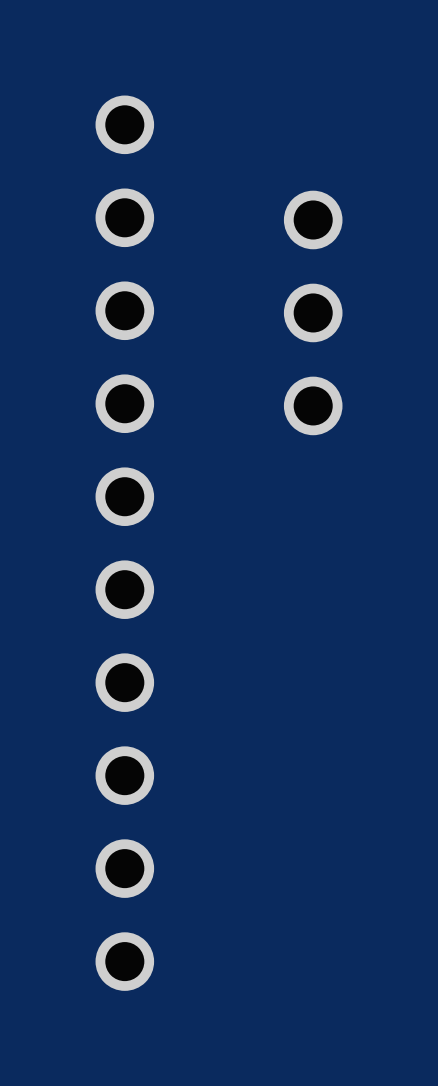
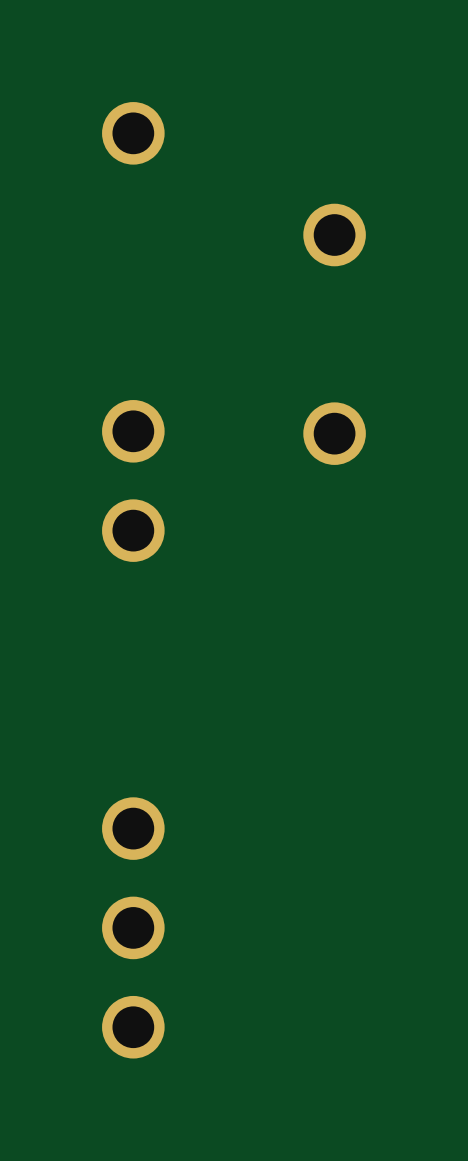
part: (124, 217) -> none
part: (124, 310) -> none
part: (313, 312) -> none
part: (124, 589) -> none
part: (124, 682) -> none

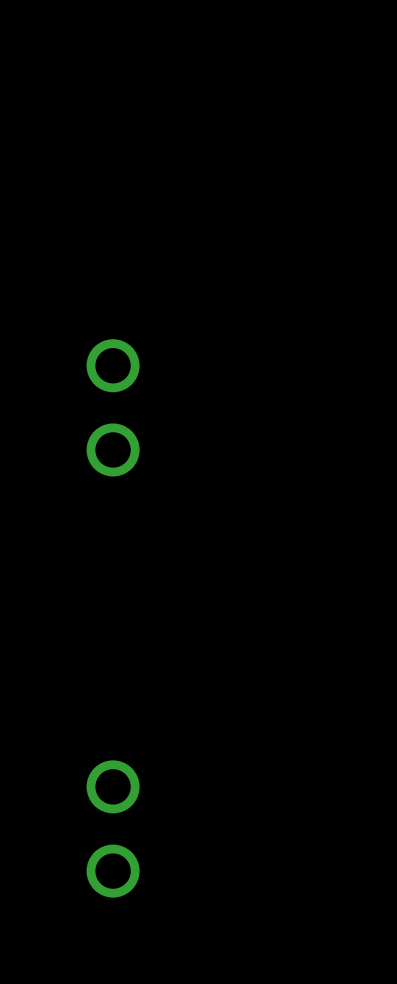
part: (133, 133) -> none
part: (334, 235) -> none
part: (334, 433) -> none
part: (133, 828) -> none

